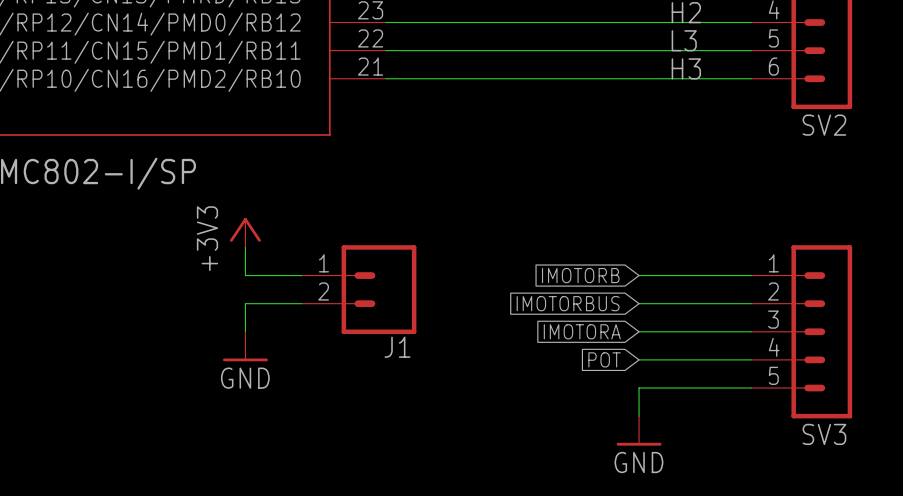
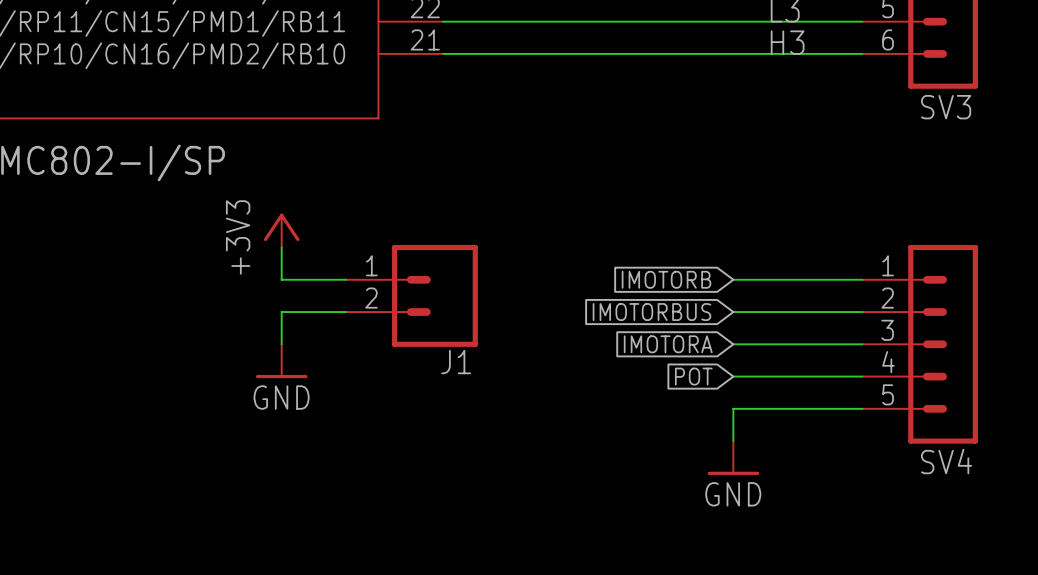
SV2 name: SV2 (824, 125) -> SV3 (946, 107)
SV3 name: SV3 (824, 434) -> SV4 (946, 461)

